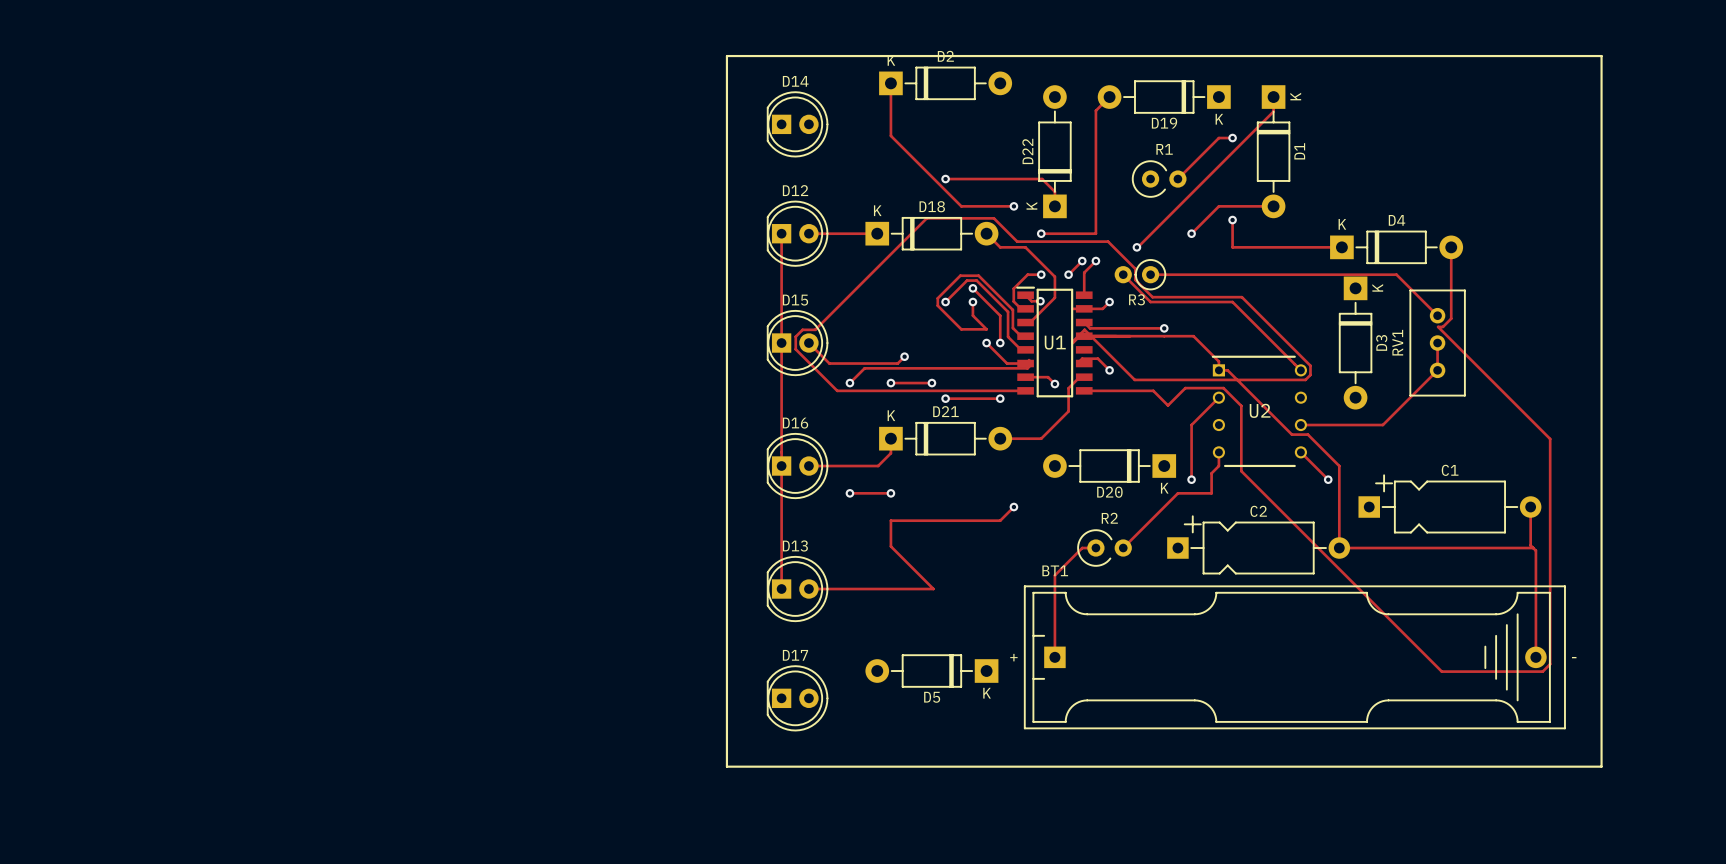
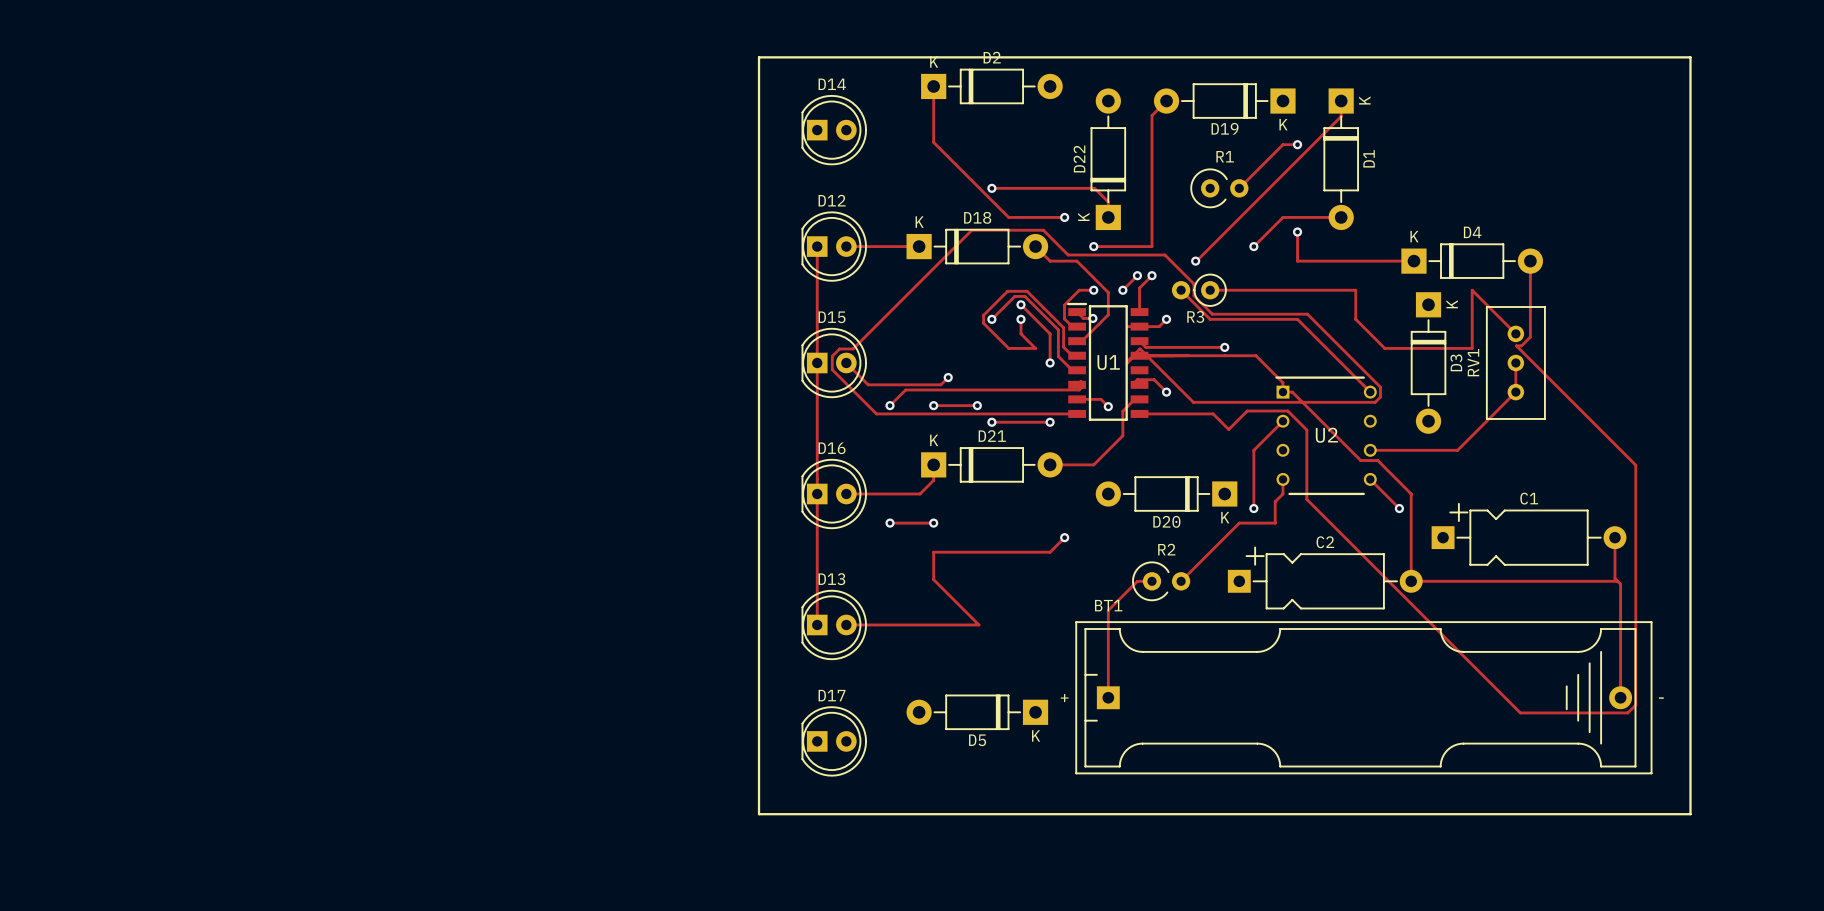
track: (1287, 274) (1396, 274) -> (1355, 290) (1355, 319) (1384, 348) (1472, 348) (1472, 290)
track: (986, 343) (1007, 363) (1025, 363) -> none
via: (986, 343) -> none

